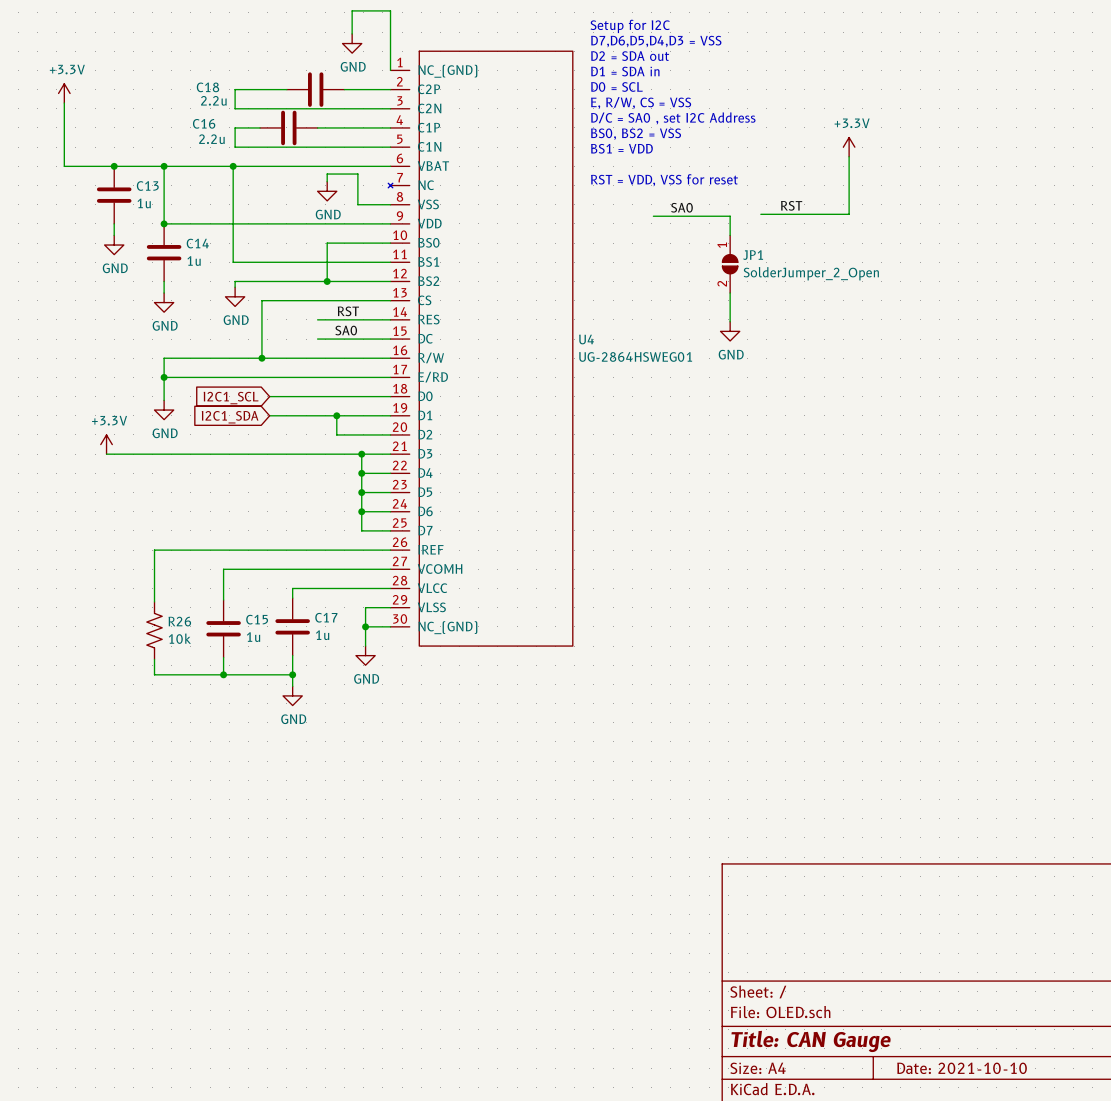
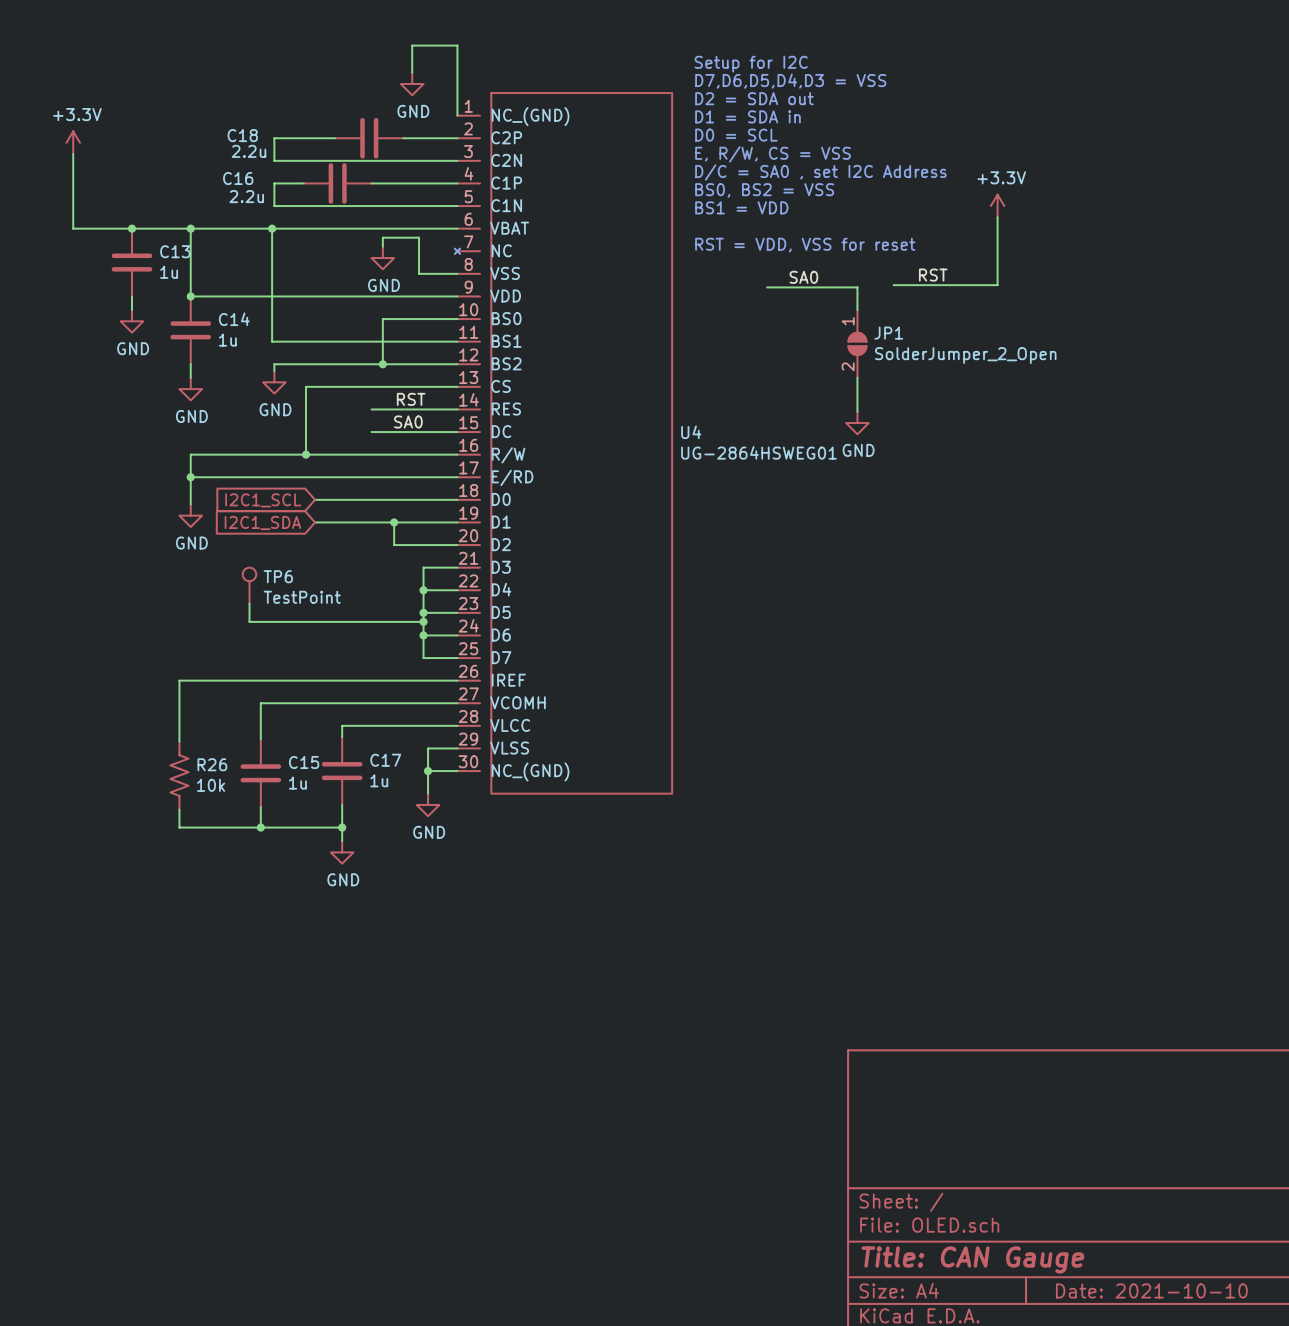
power symbol: +3.3V (106, 444) -> none
wire: (106, 454) (361, 454) -> none
junction: (361, 454) -> none
TP6: none -> TestPoint (249, 585)
wire: none -> (249, 603) (249, 621) (423, 621)
junction: none -> (423, 621)

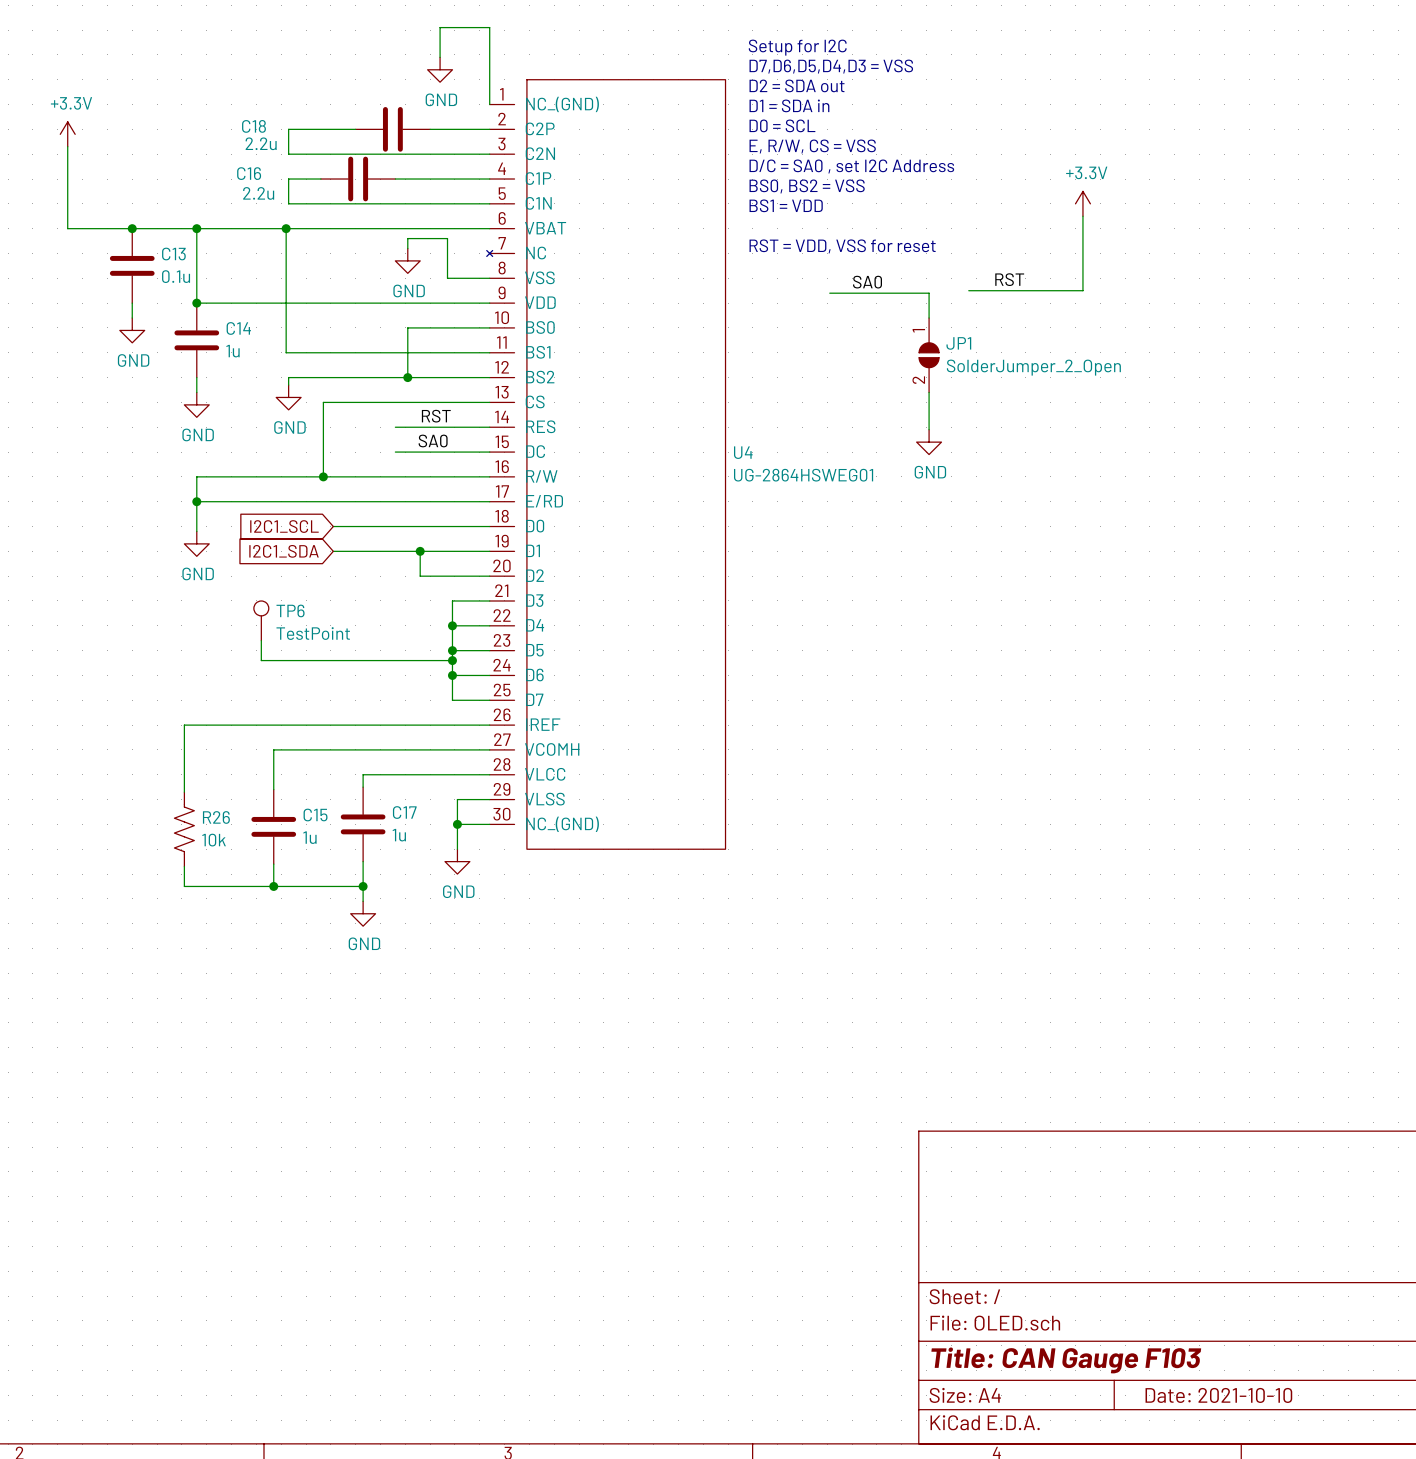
C13 value: 1u (169, 272) -> 0.1u (176, 276)
title block: Title: CAN Gauge (972, 1259) -> Title: CAN Gauge F103 (1066, 1360)

